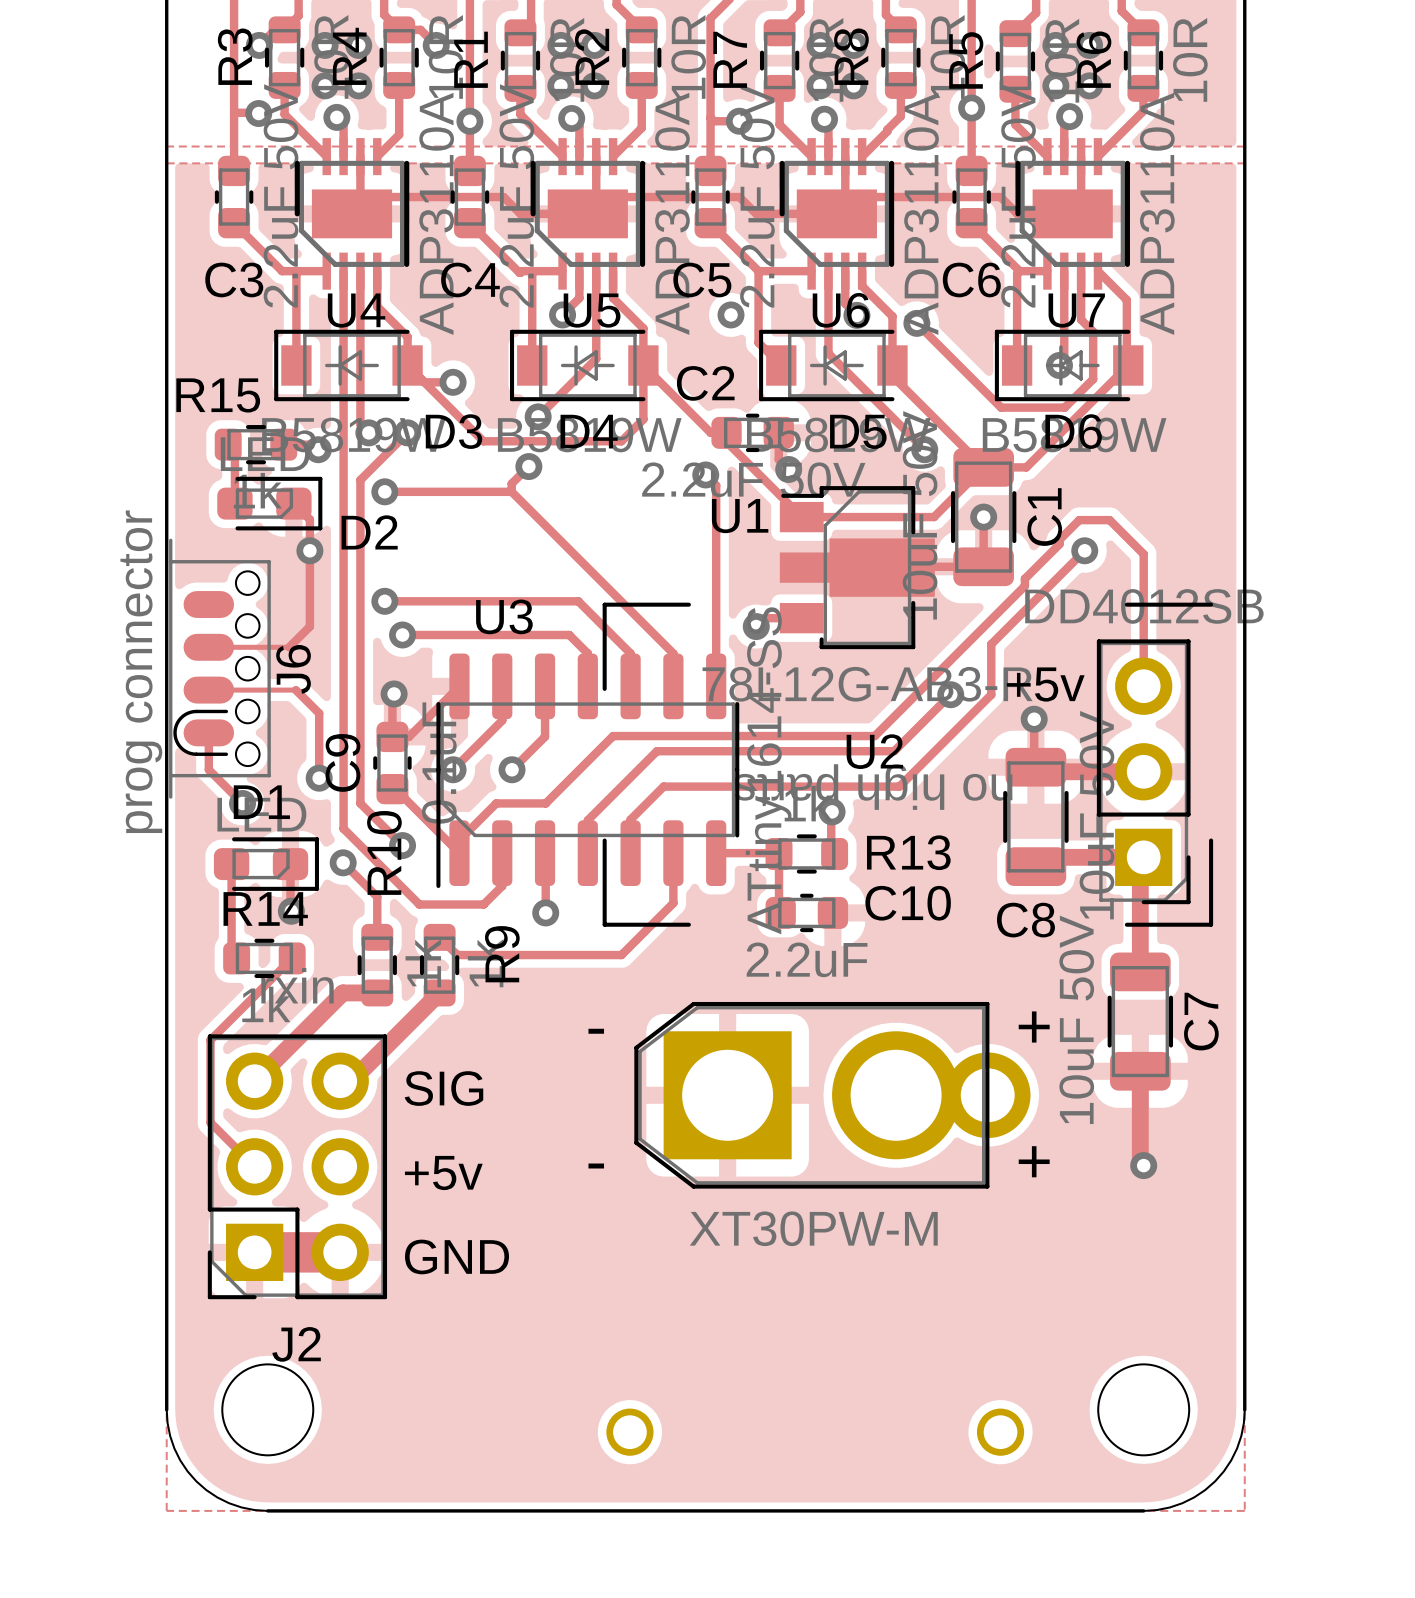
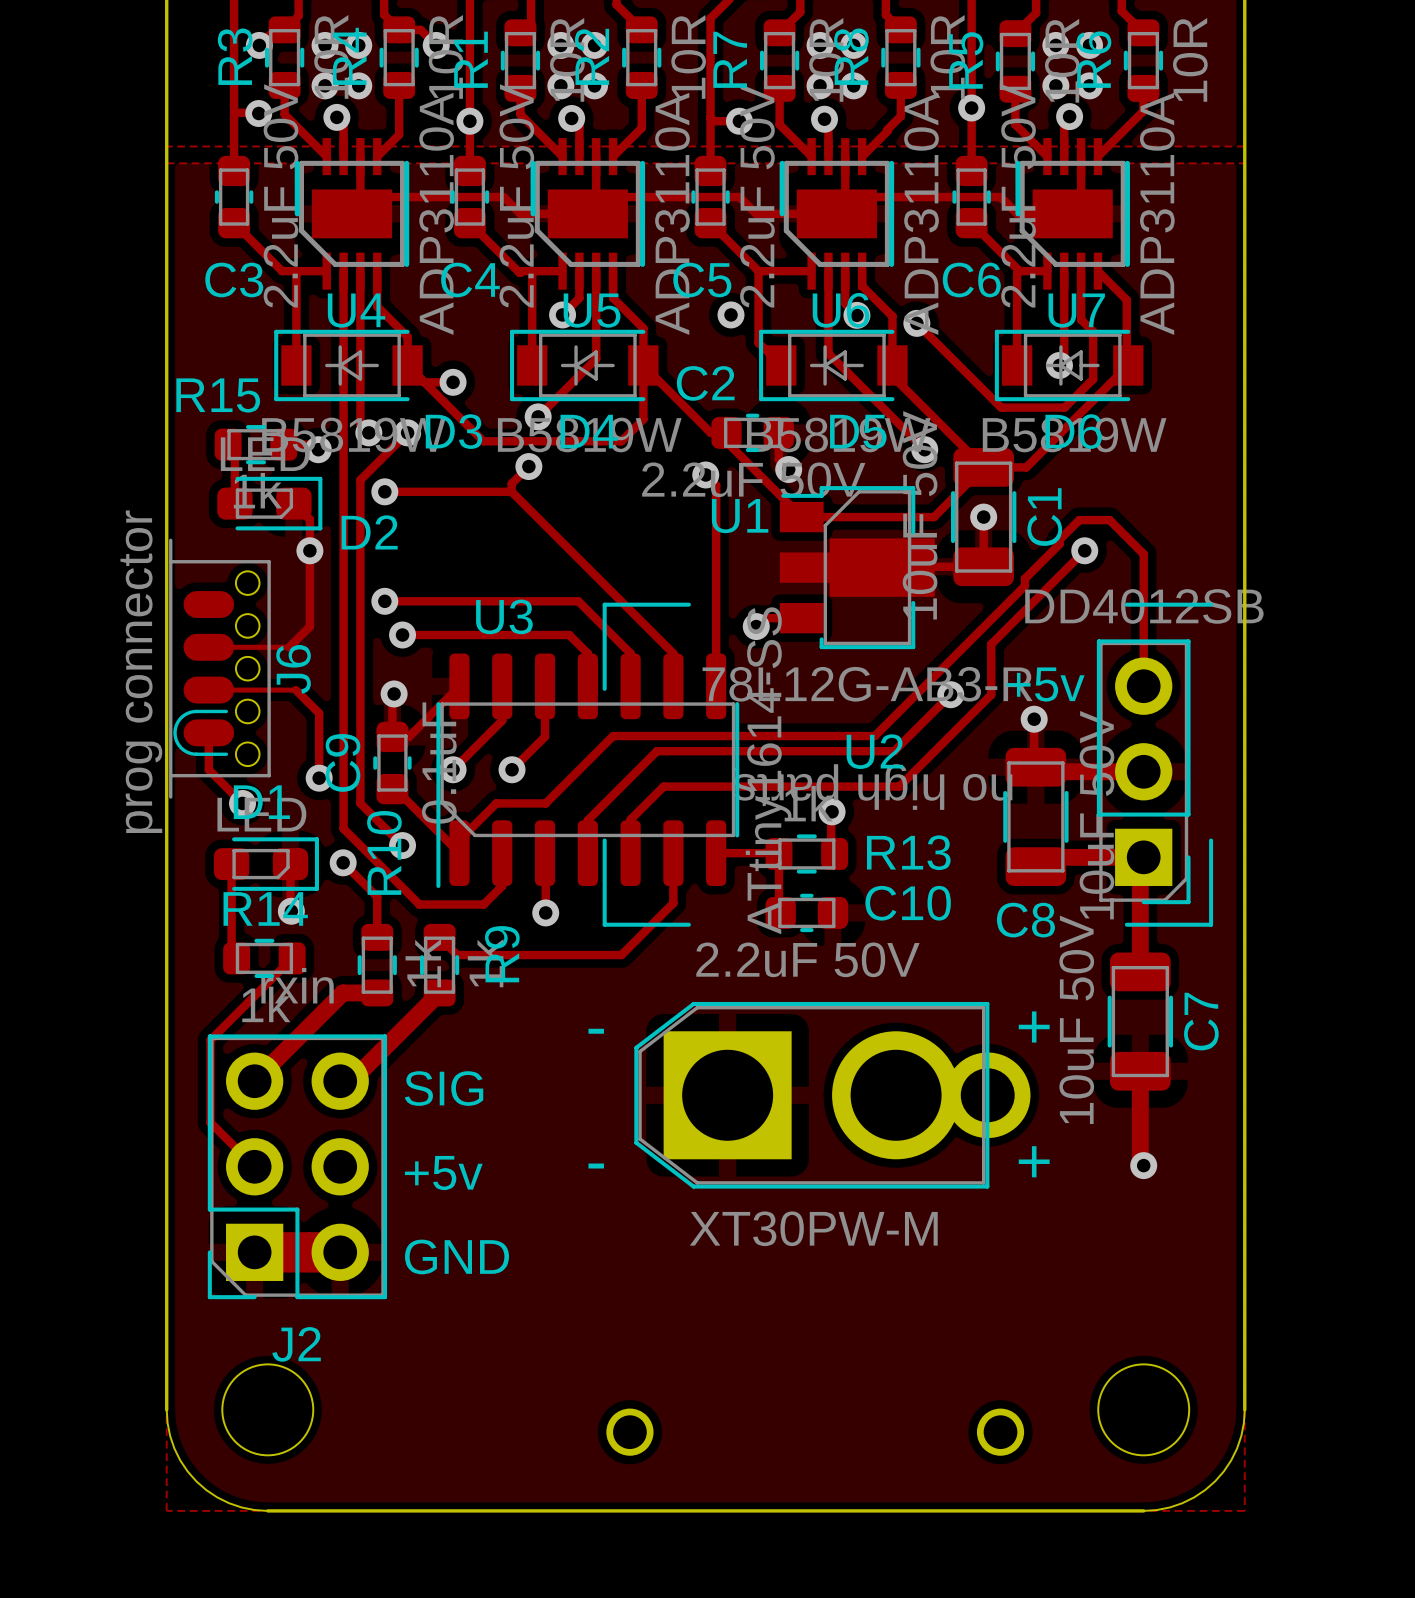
C10 value: 2.2uF (807, 959) -> 2.2uF 50V (807, 959)

